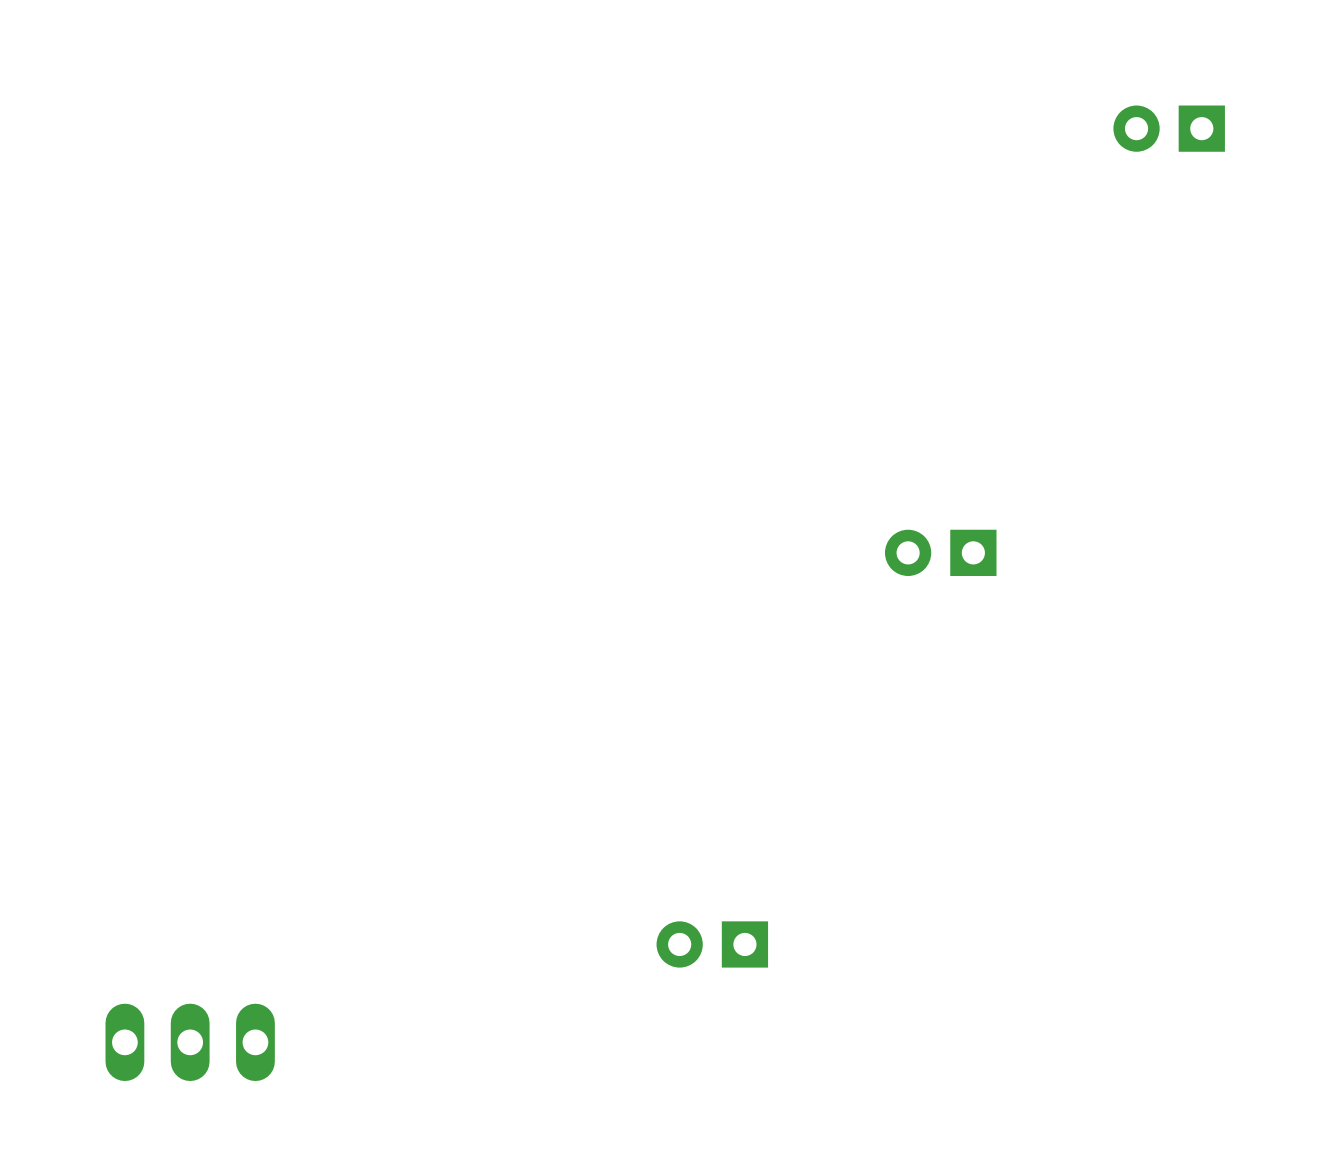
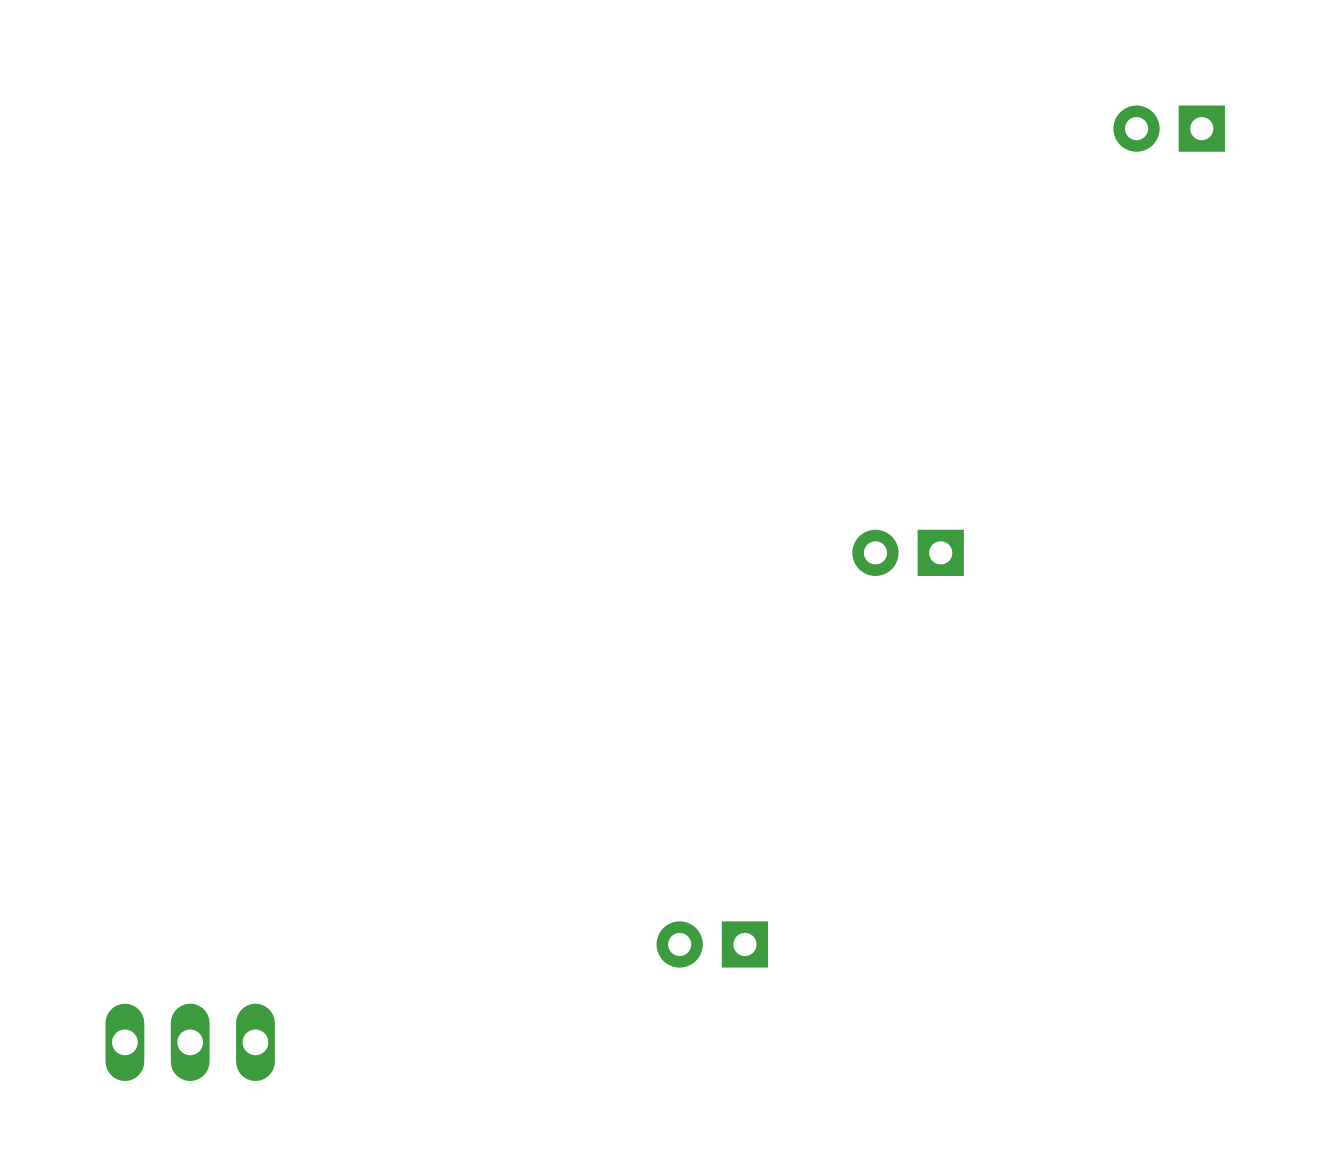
part position: (940, 552) -> (908, 552)

